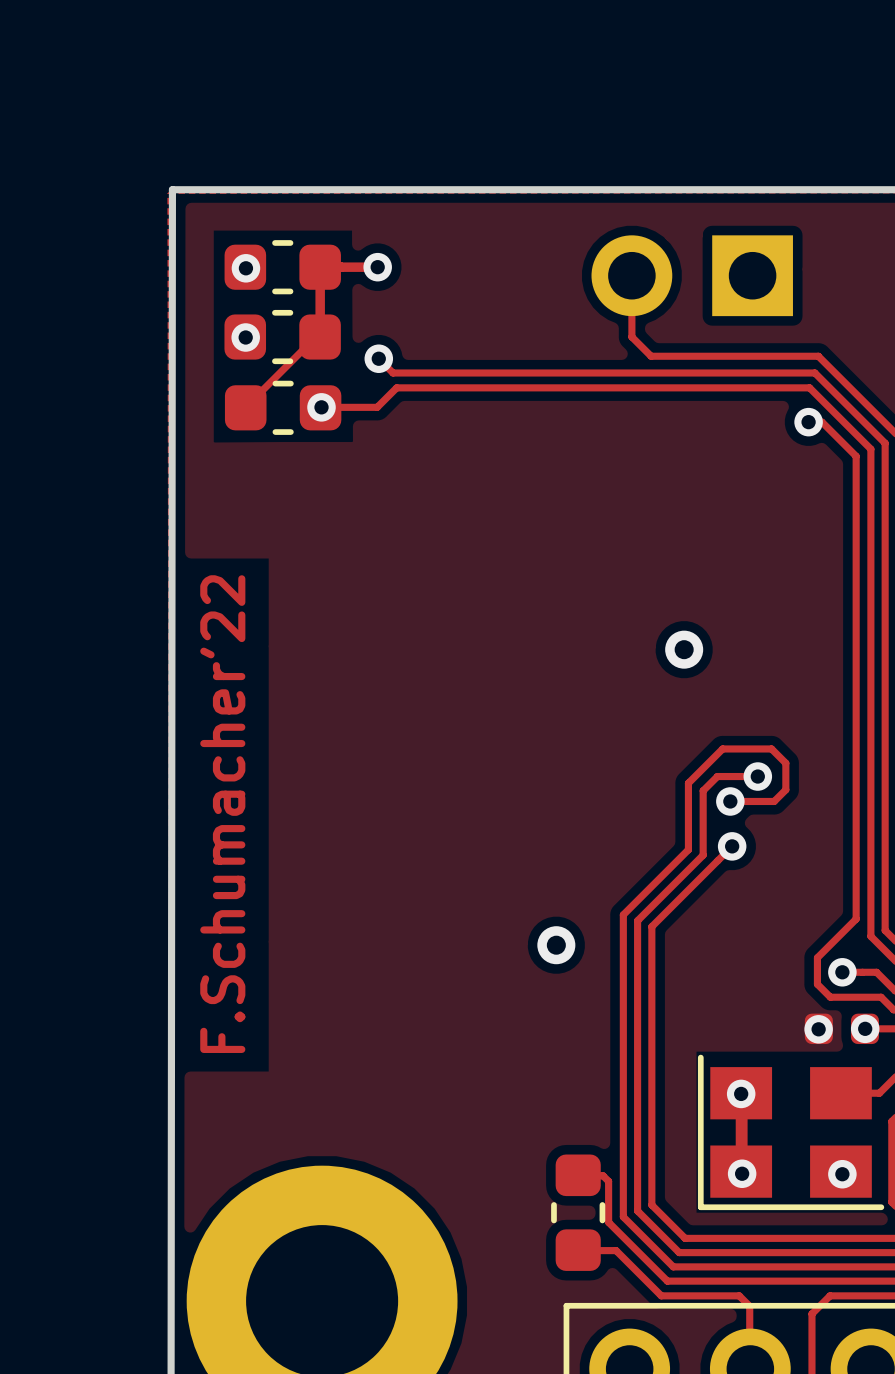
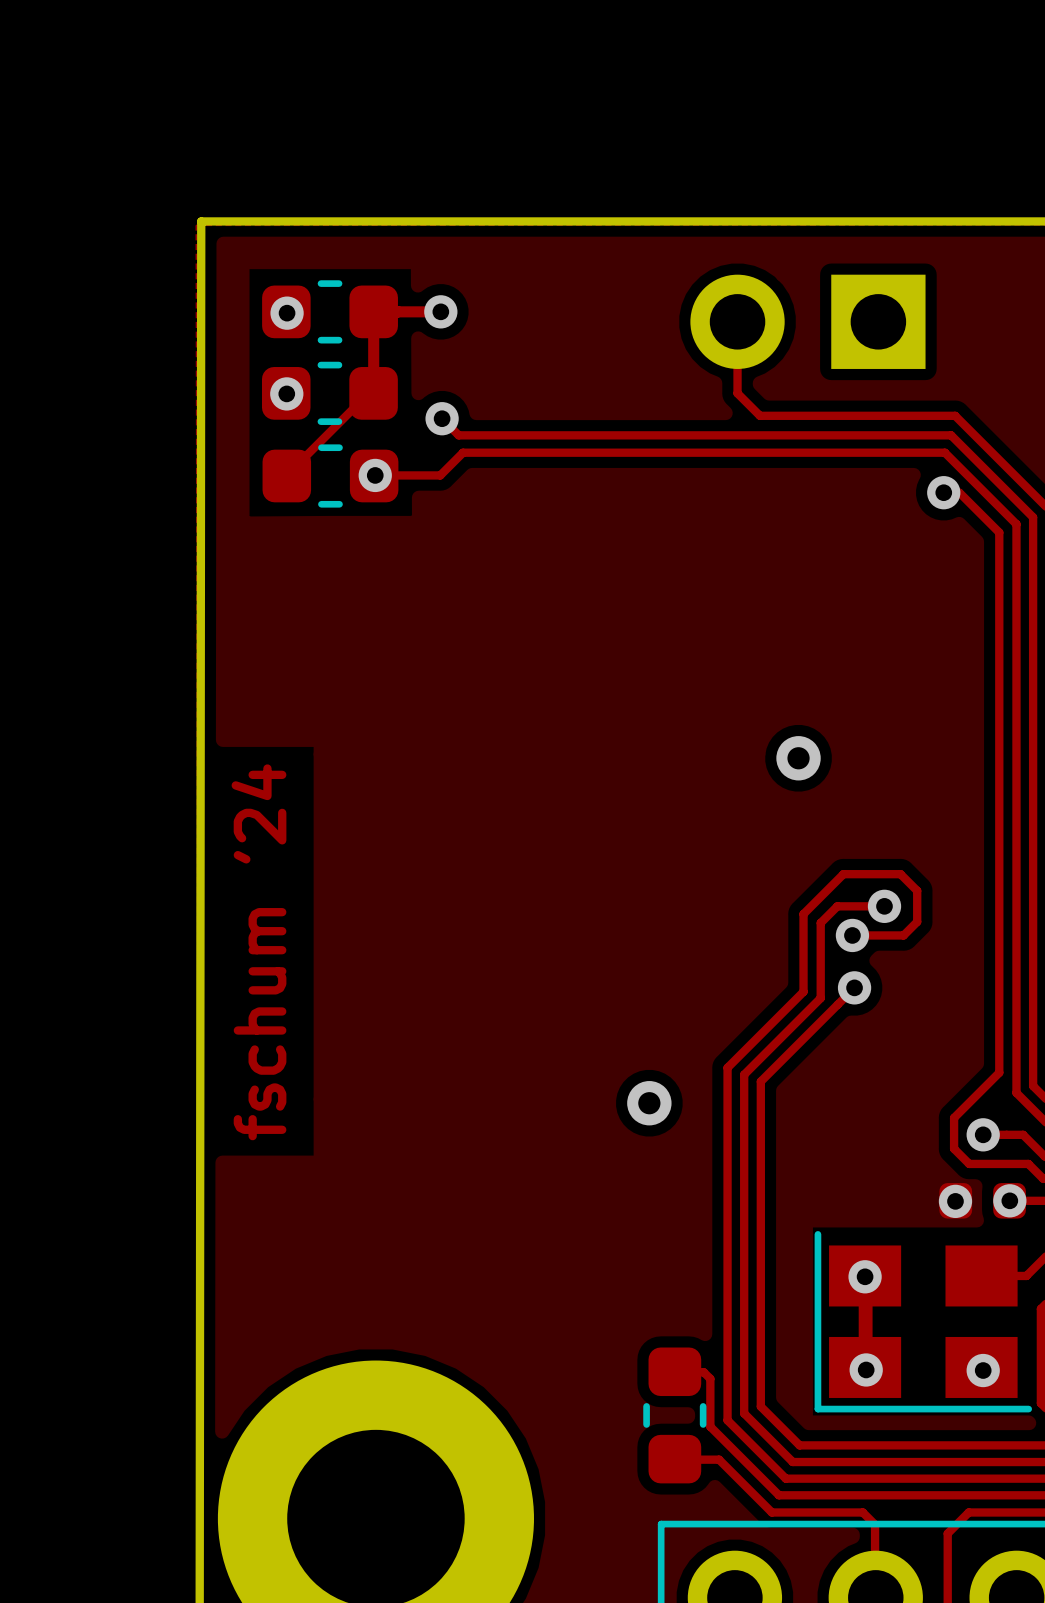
text: F.Schumacher'22 (222, 814) -> fschum '24 (258, 952)

